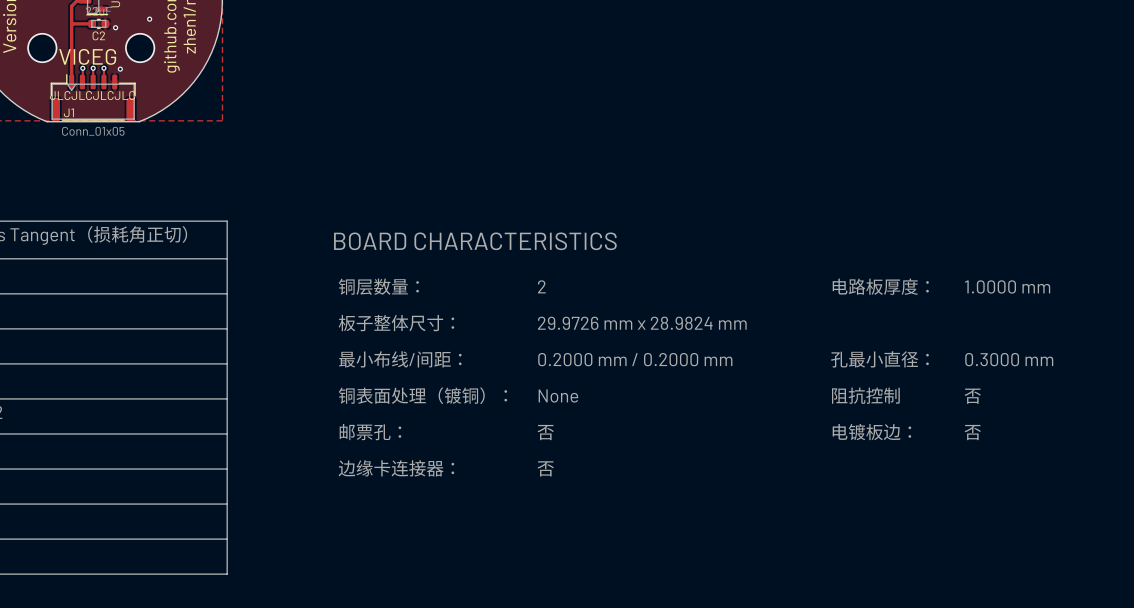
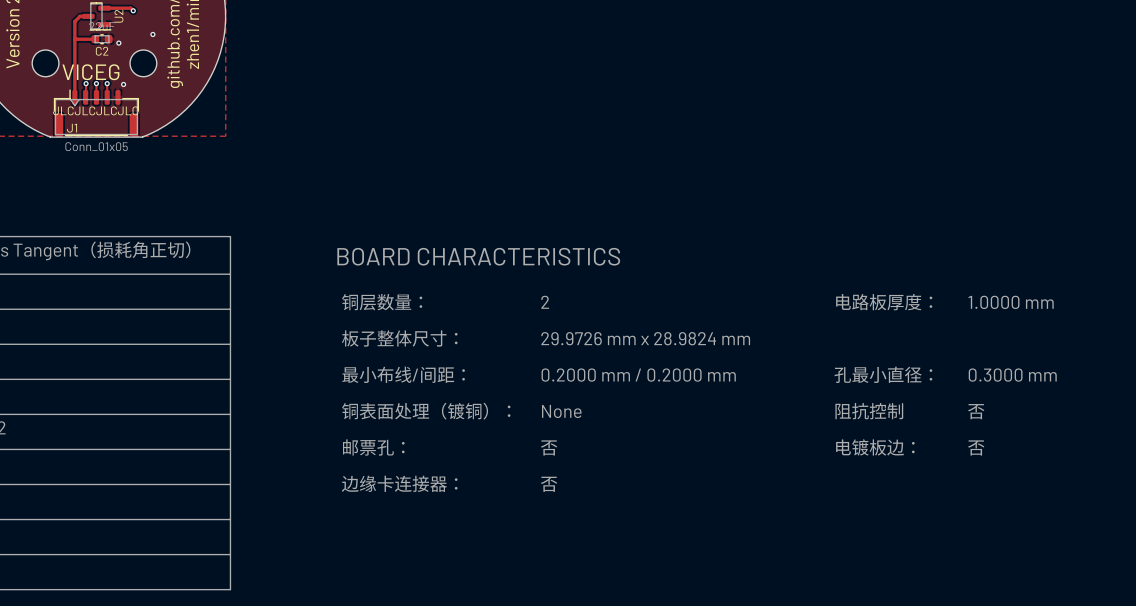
round board edge: none -> [31, 49, 60, 78]
round board edge: none -> [129, 49, 158, 78]
via: (42, 48) -> none
via: (140, 48) -> none

